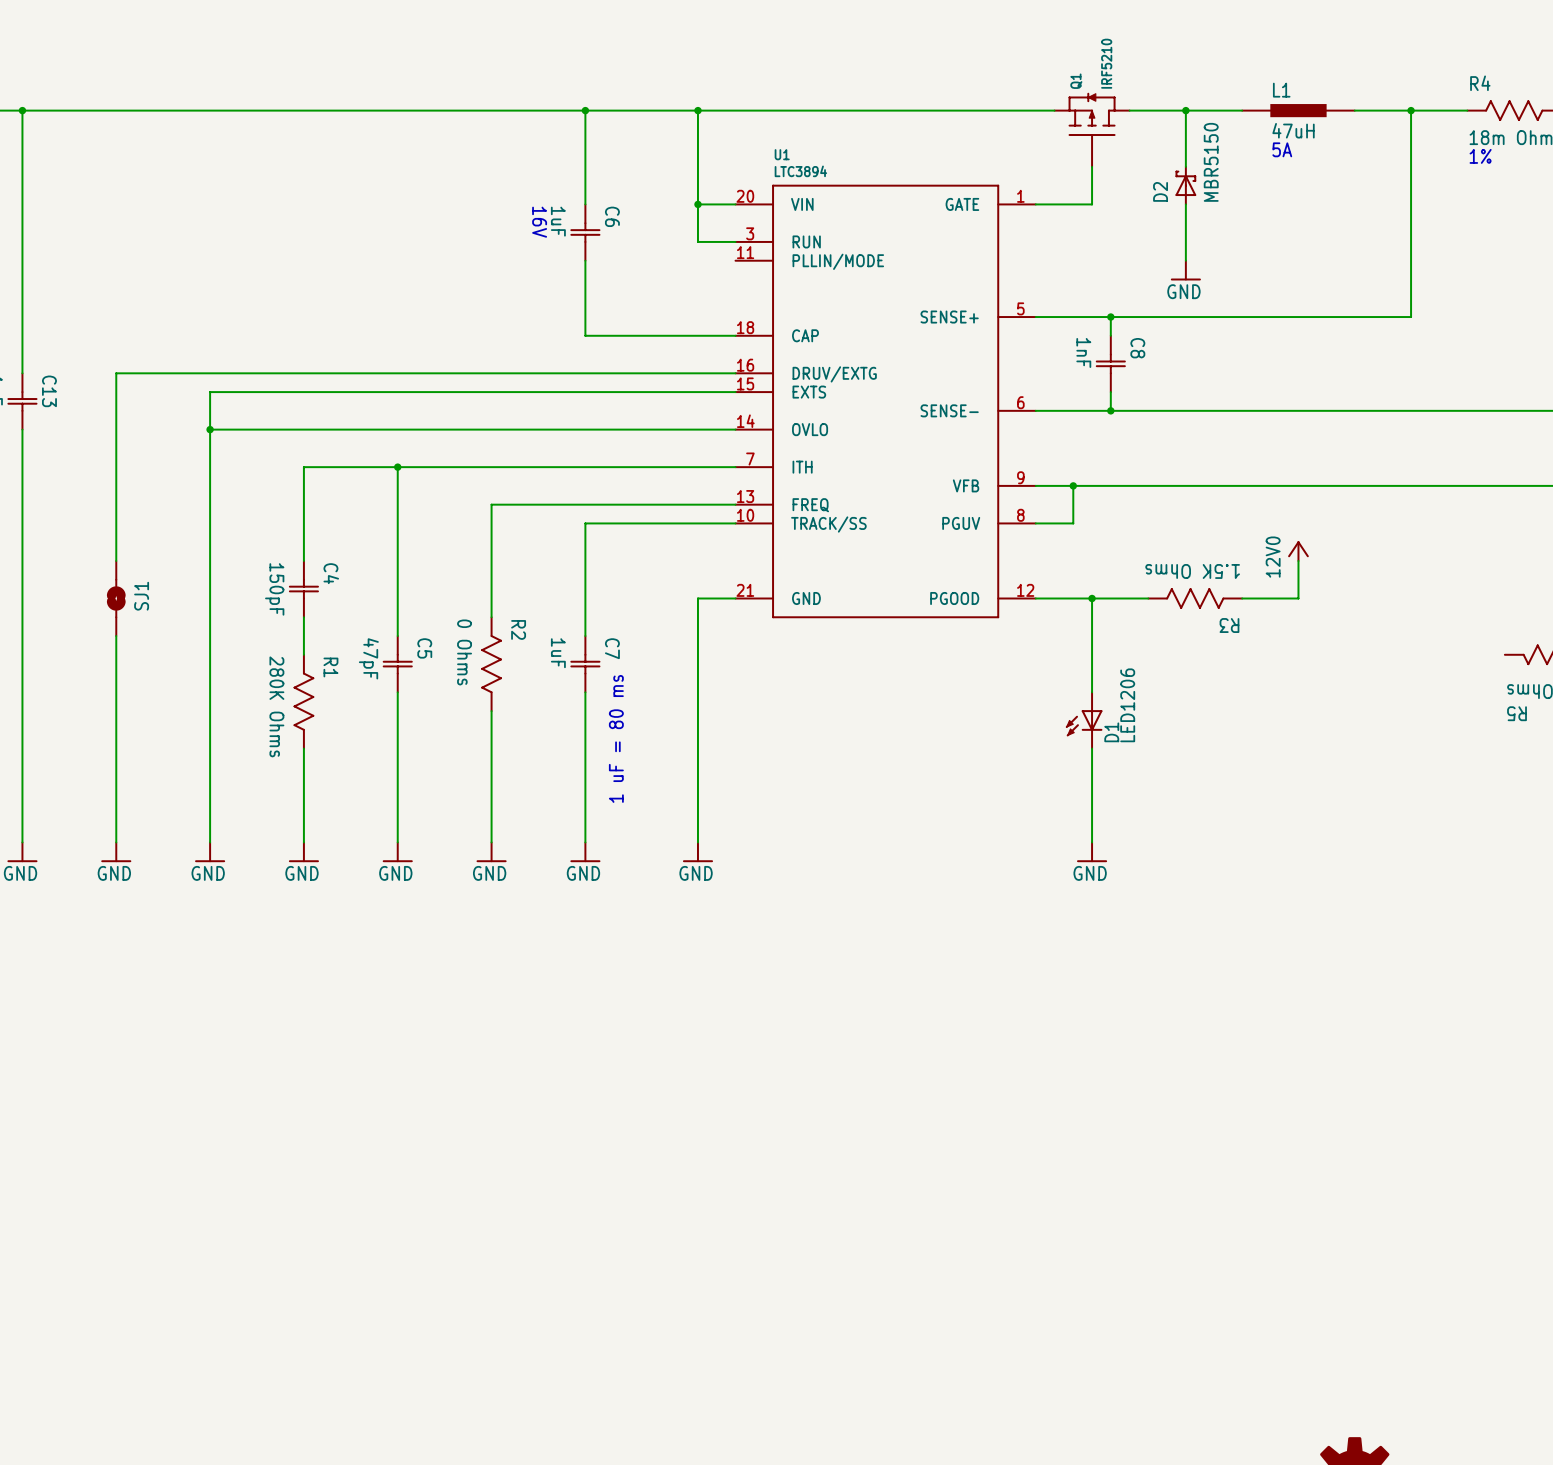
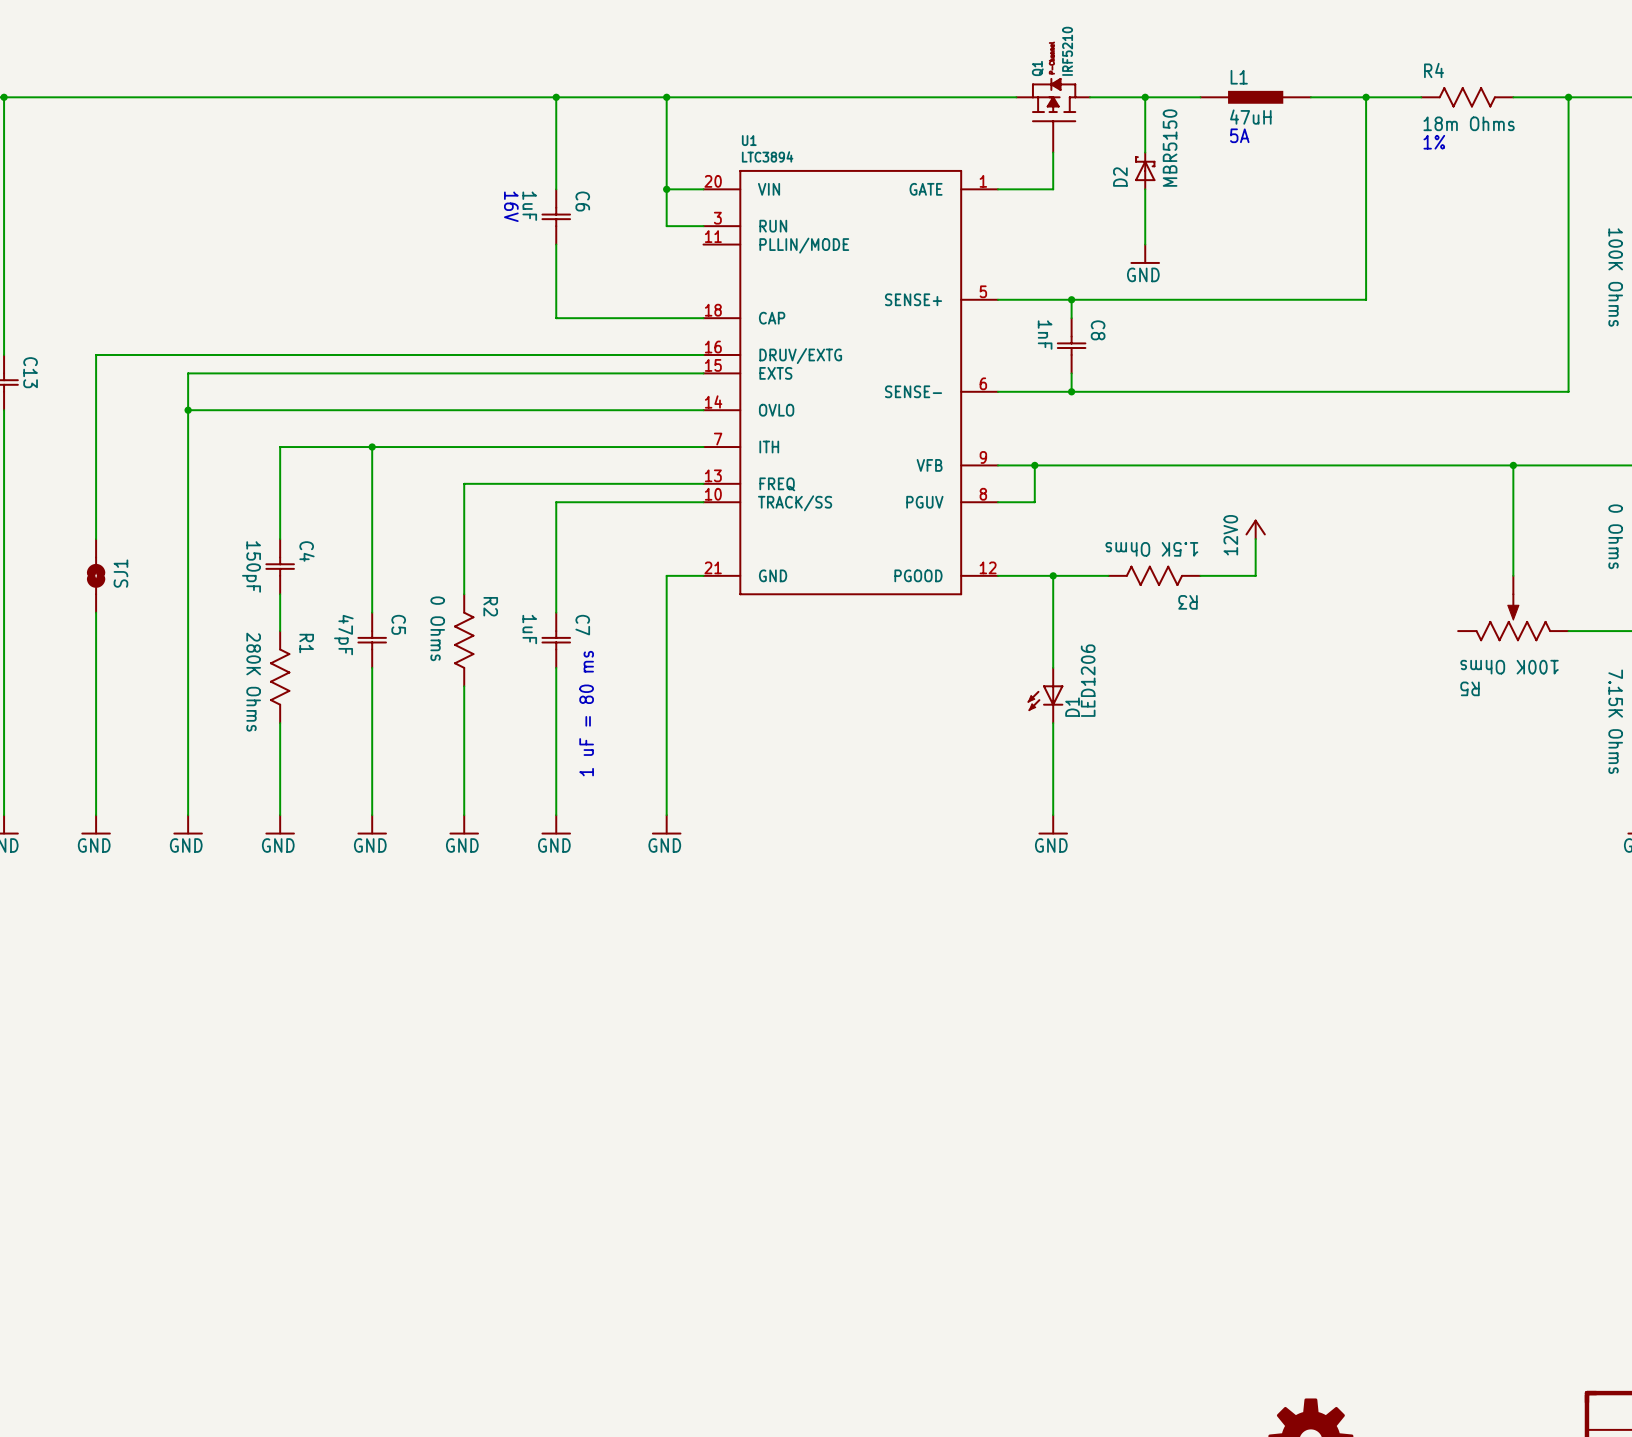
Q1 symbol: [1053, 93, 1131, 168] -> [1015, 78, 1091, 154]

